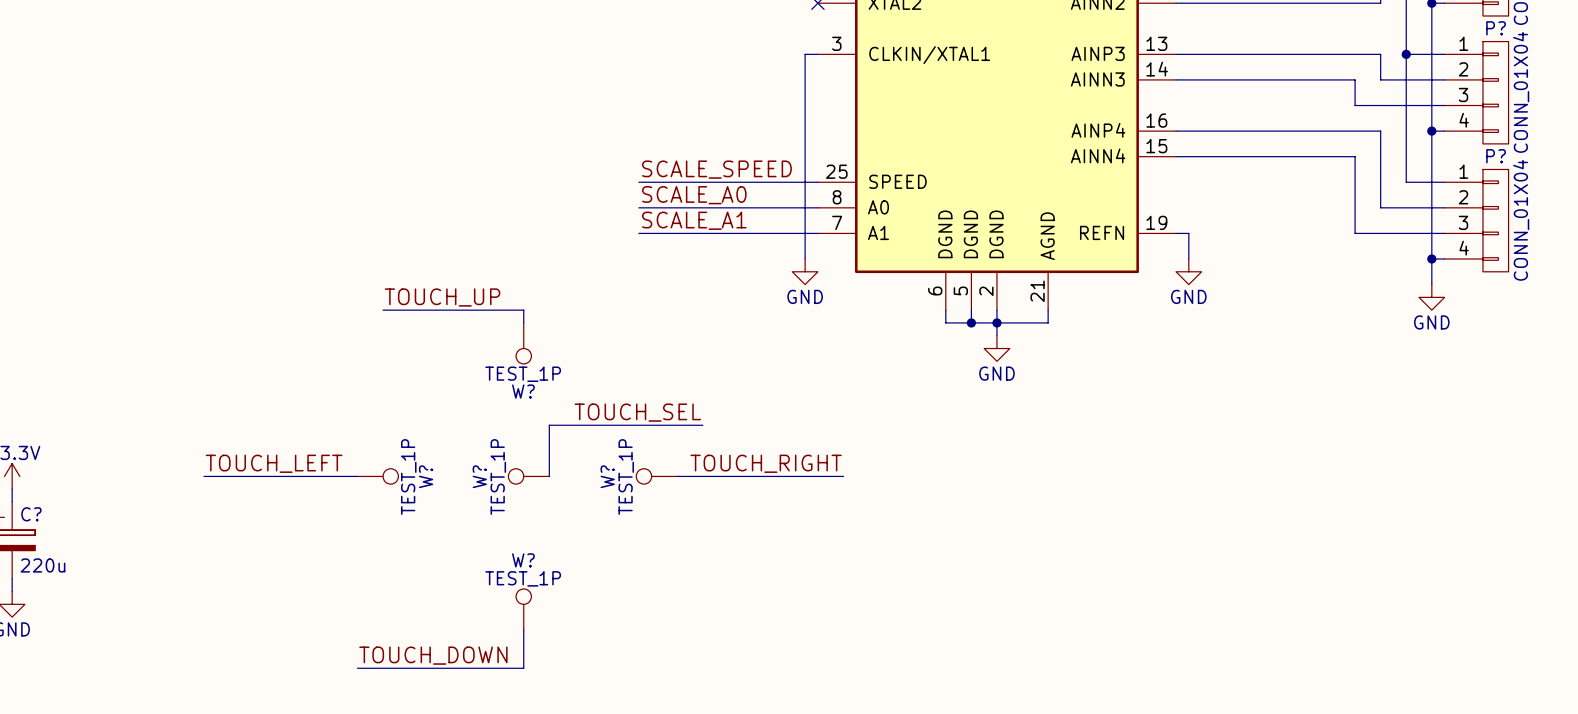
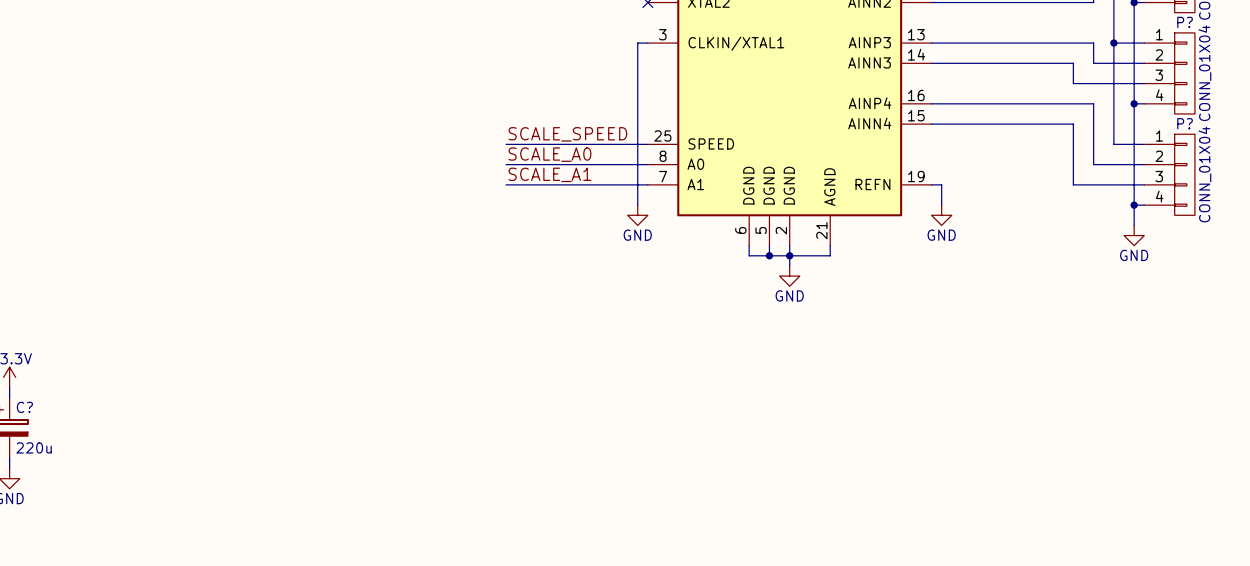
label: TOUCH_UP (442, 297) -> none
wire: (383, 310) (523, 310) (523, 322) -> none
W?: TEST_1P (523, 343) -> none
label: TOUCH_SEL (637, 412) -> none
wire: (702, 425) (549, 425) (549, 476) -> none
label: TOUCH_LEFT (274, 463) -> none
label: TOUCH_RIGHT (766, 463) -> none
wire: (204, 476) (357, 476) -> none
W?: TEST_1P (377, 476) -> none
W?: TEST_1P (528, 476) -> none
W?: TEST_1P (656, 476) -> none
wire: (677, 476) (843, 476) -> none
W?: TEST_1P (523, 609) -> none
wire: (523, 629) (523, 668) (357, 668) -> none
label: TOUCH_DOWN (433, 655) -> none

